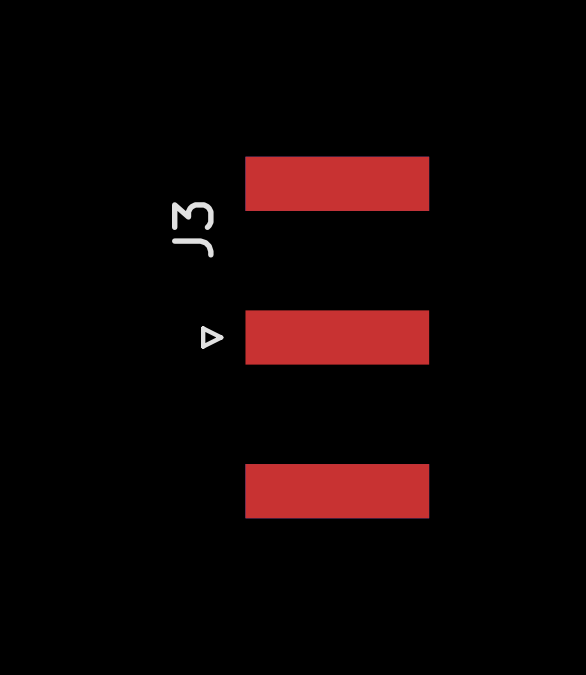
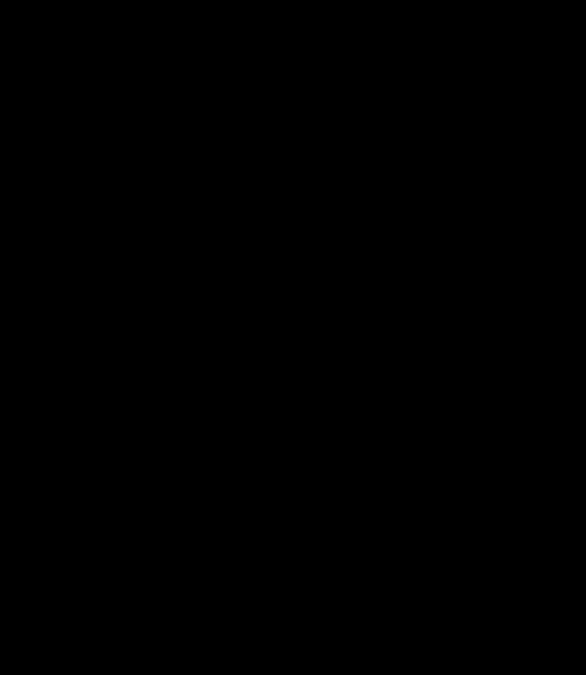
J3: (315, 337) -> none

